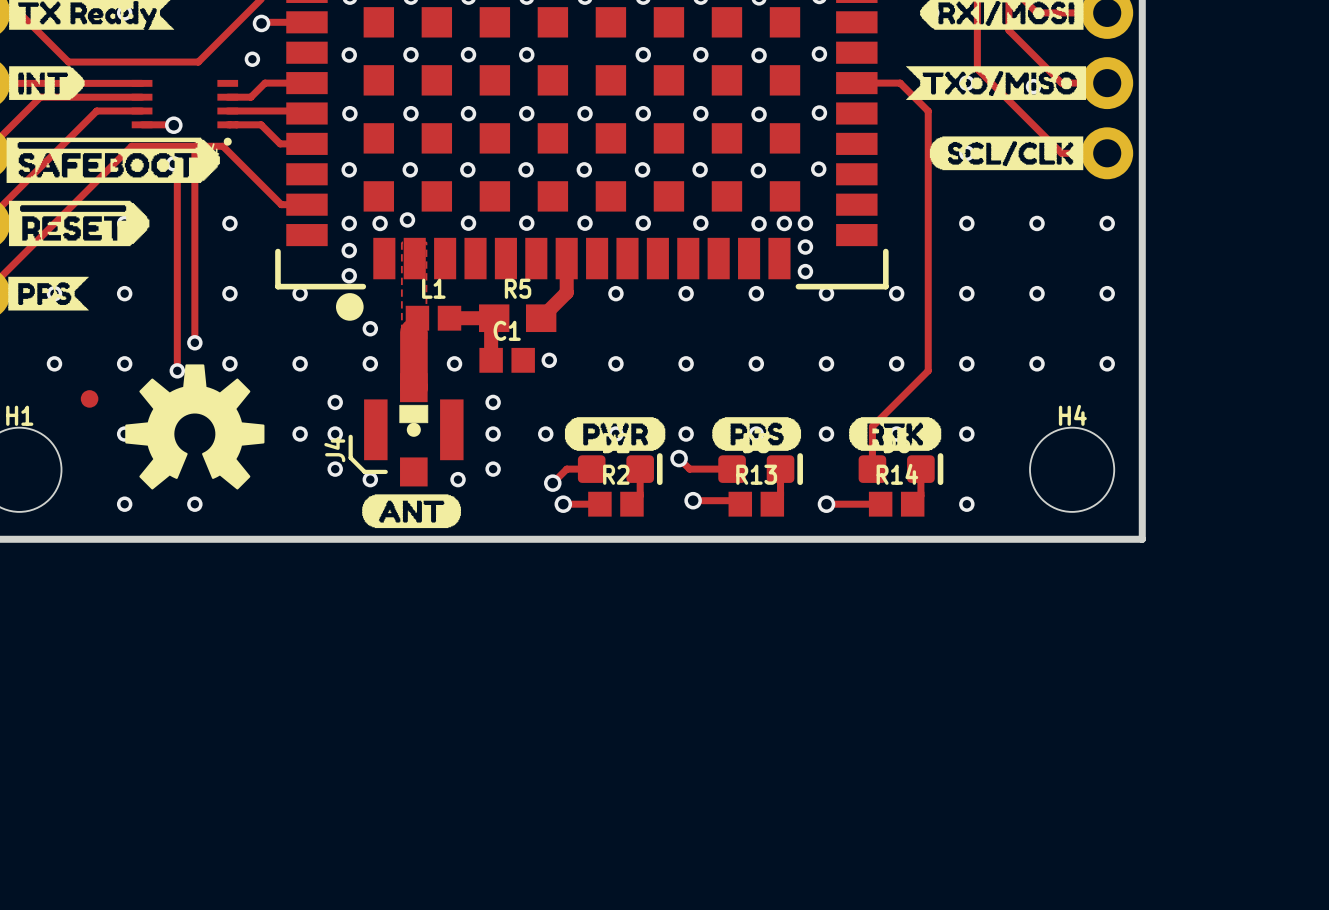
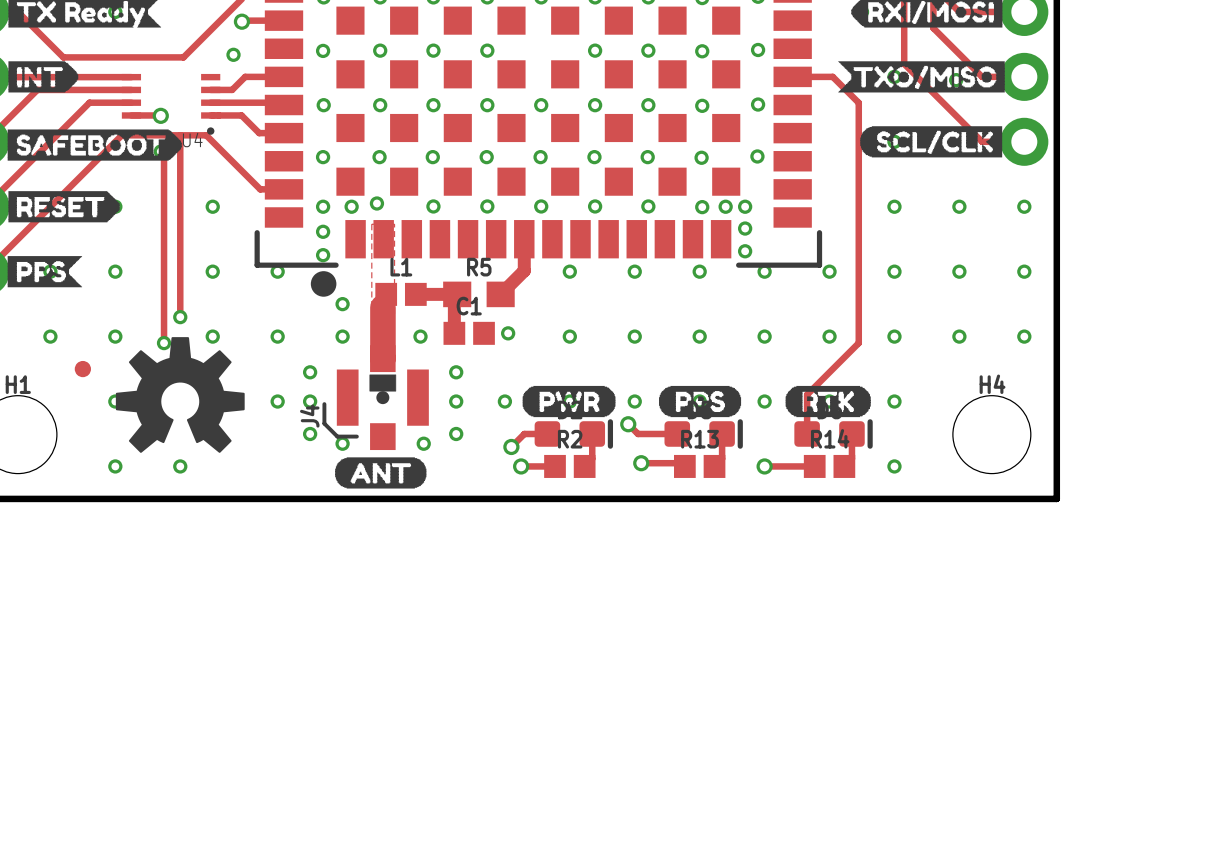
drawing shape: [6, 137, 220, 183] -> [7, 129, 182, 161]
drawing shape: [9, 200, 150, 247] -> [8, 191, 120, 223]

